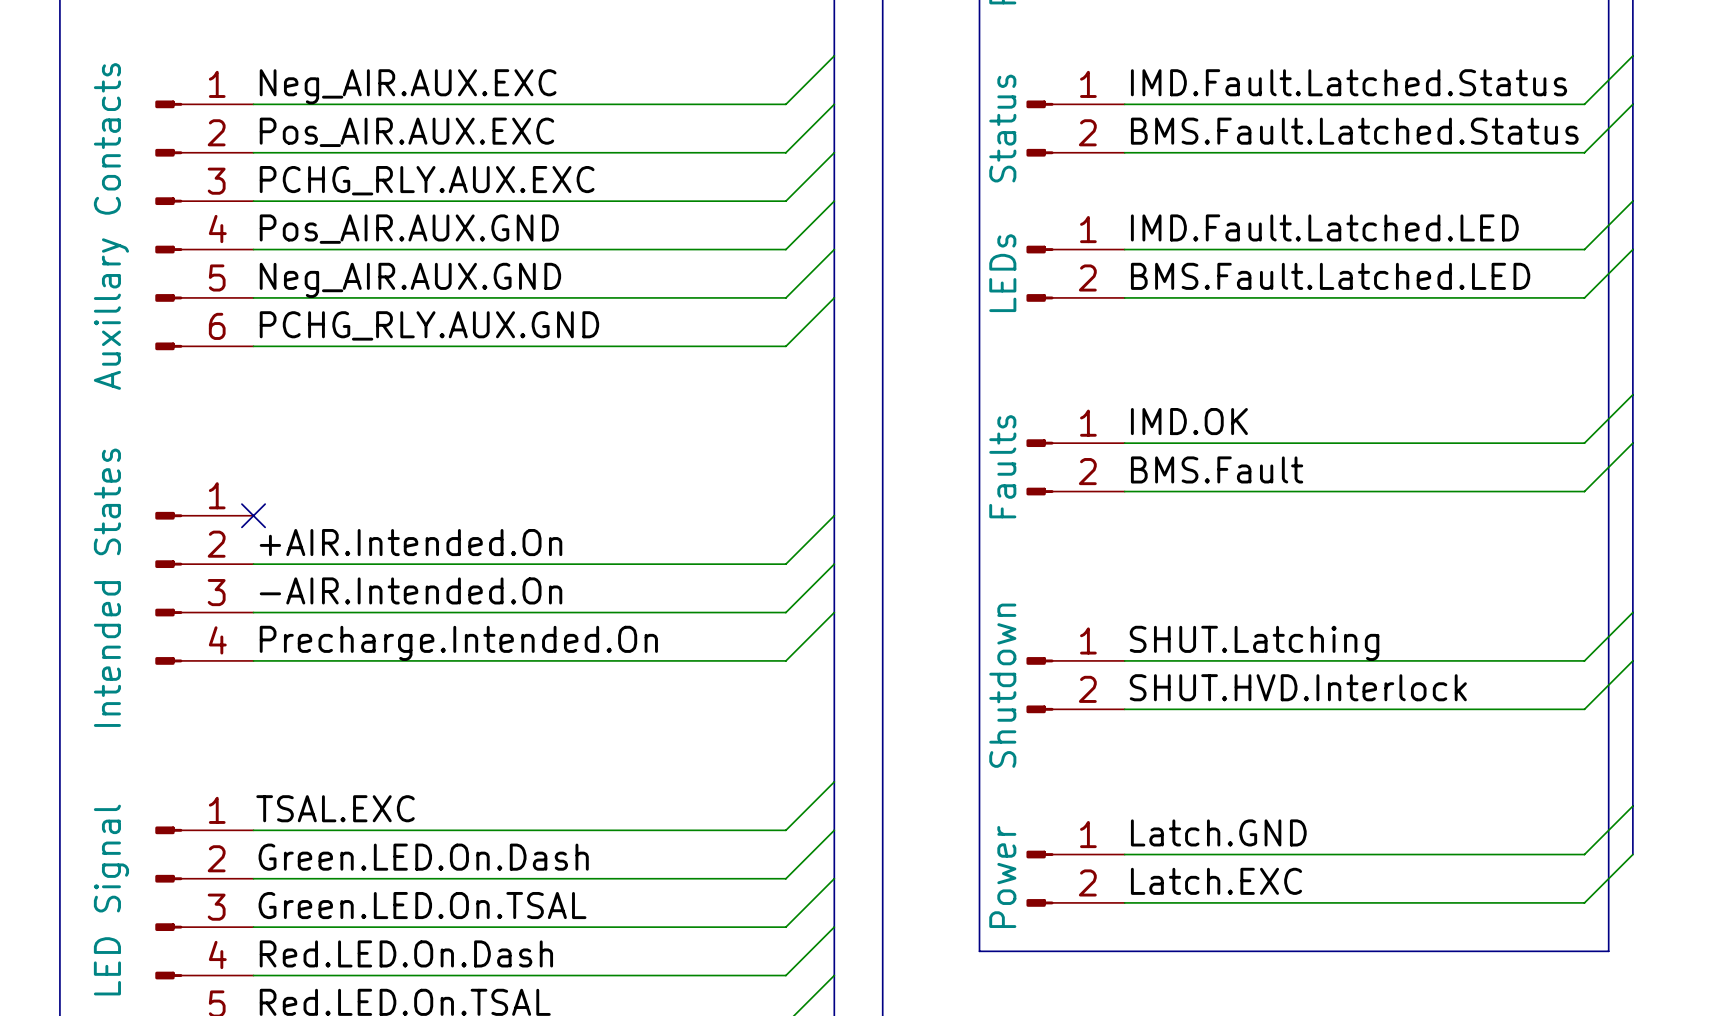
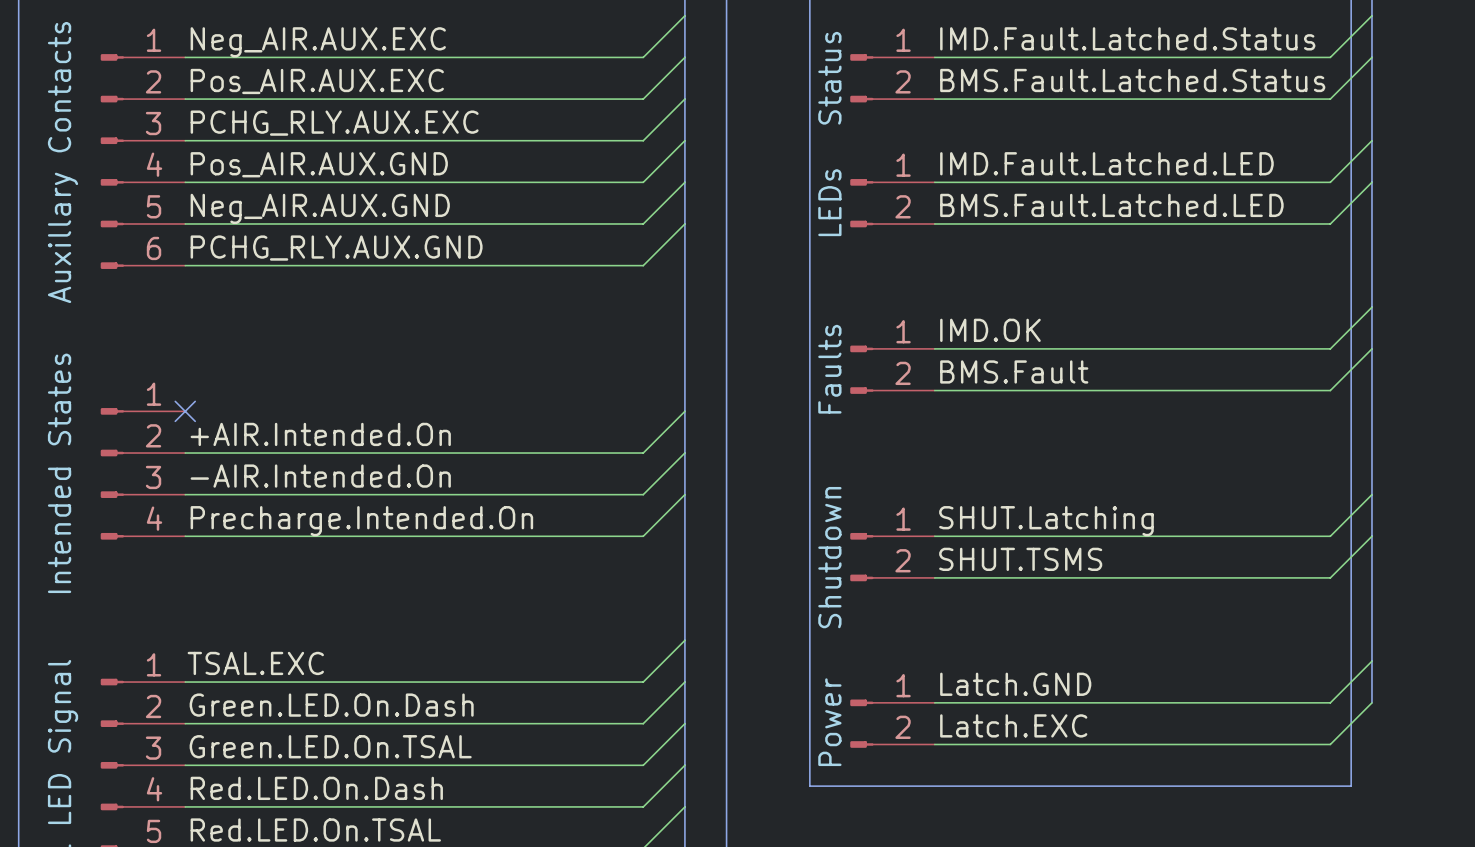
label: SHUT.HVD.Interlock (1298, 687) -> SHUT.TSMS (1020, 559)

